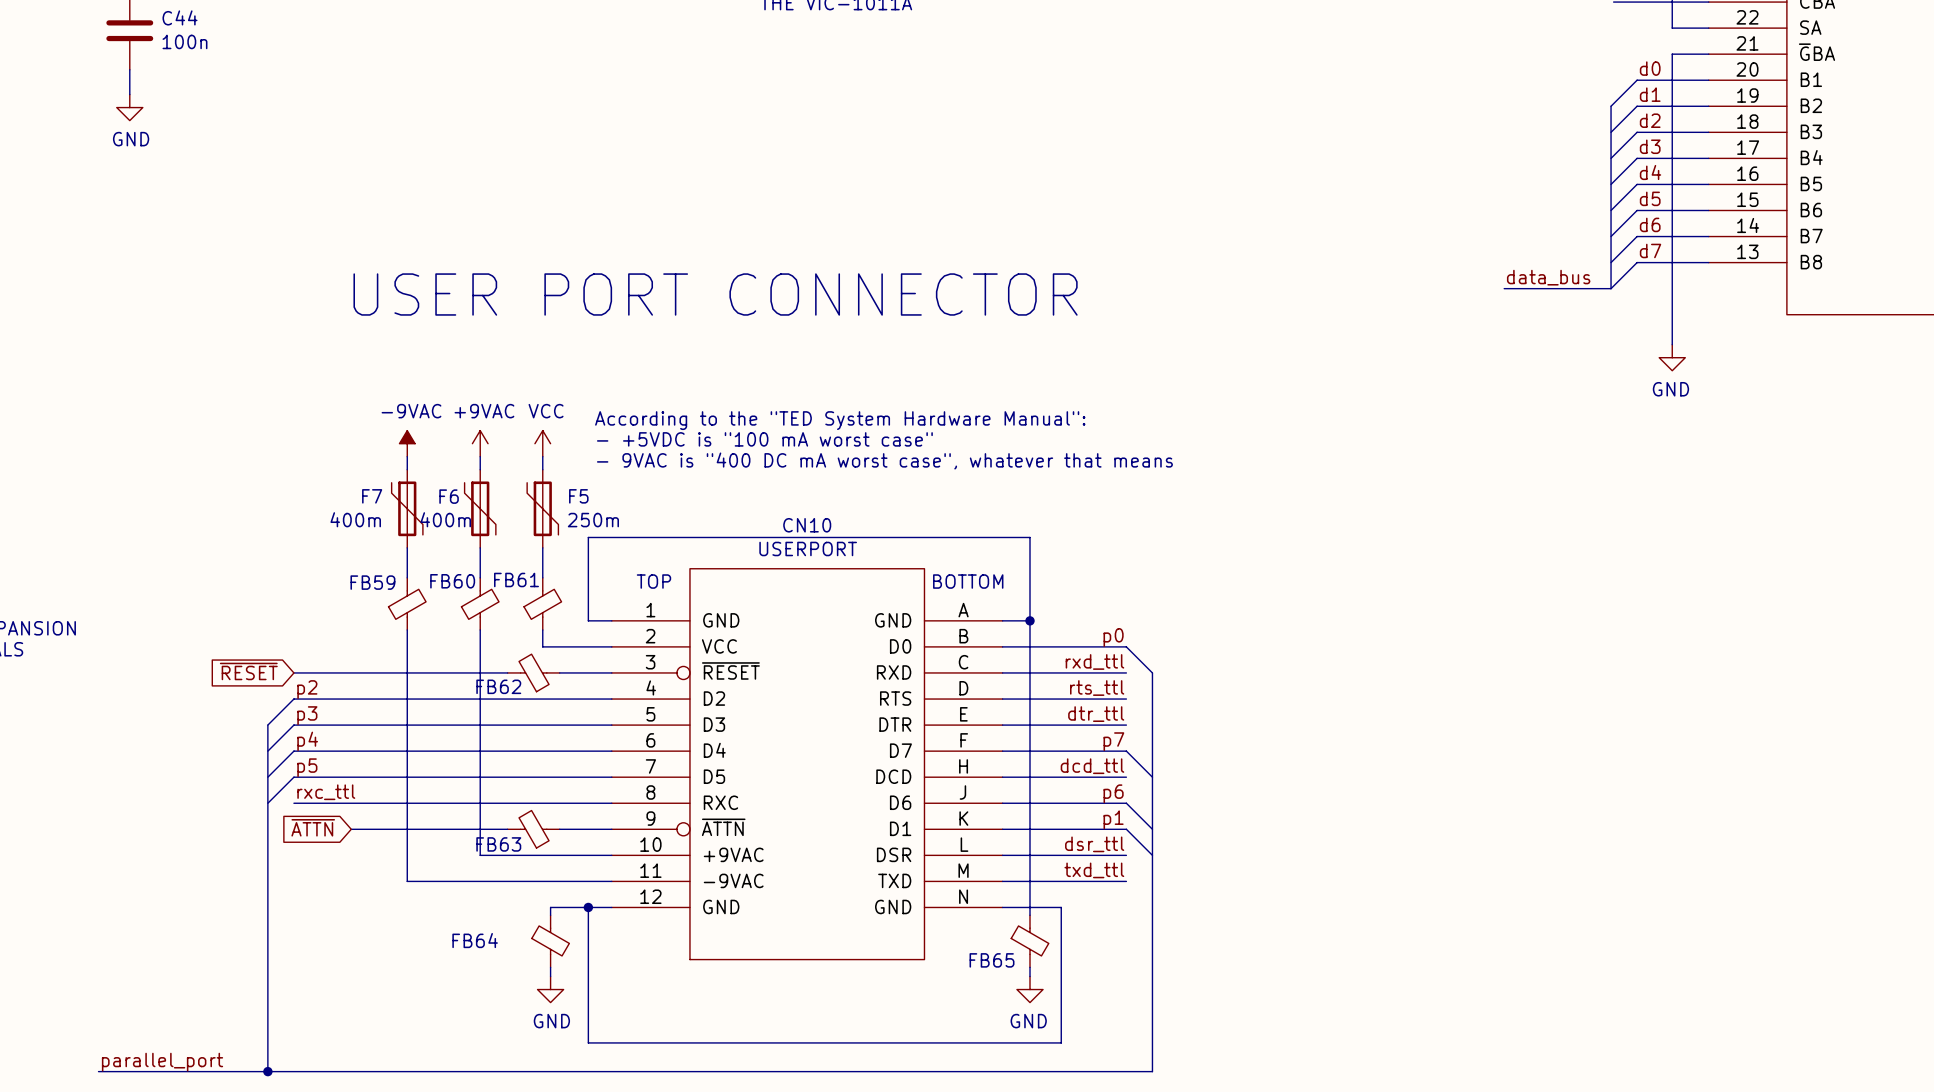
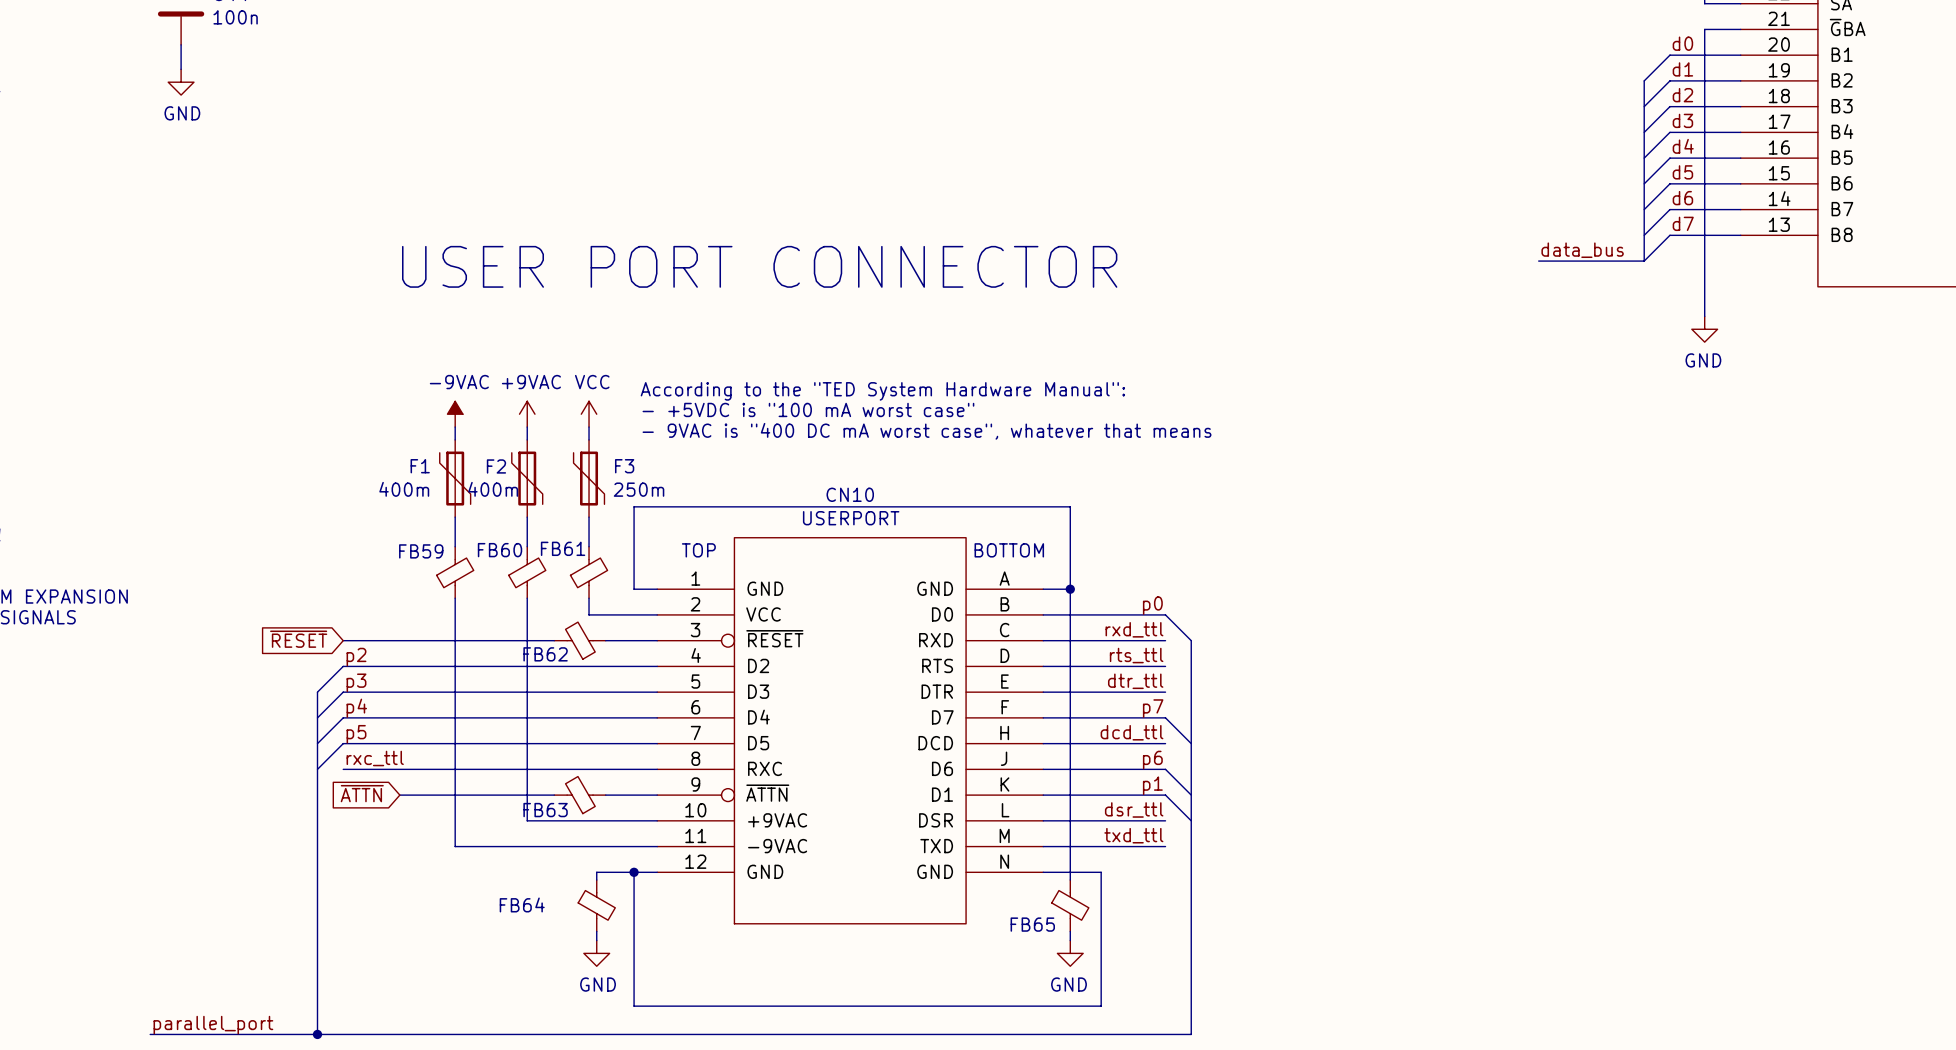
F7 name: F7 (372, 496) -> F1 (420, 466)
F6 name: F6 (449, 496) -> F2 (496, 466)
F5 name: F5 (578, 496) -> F3 (624, 466)

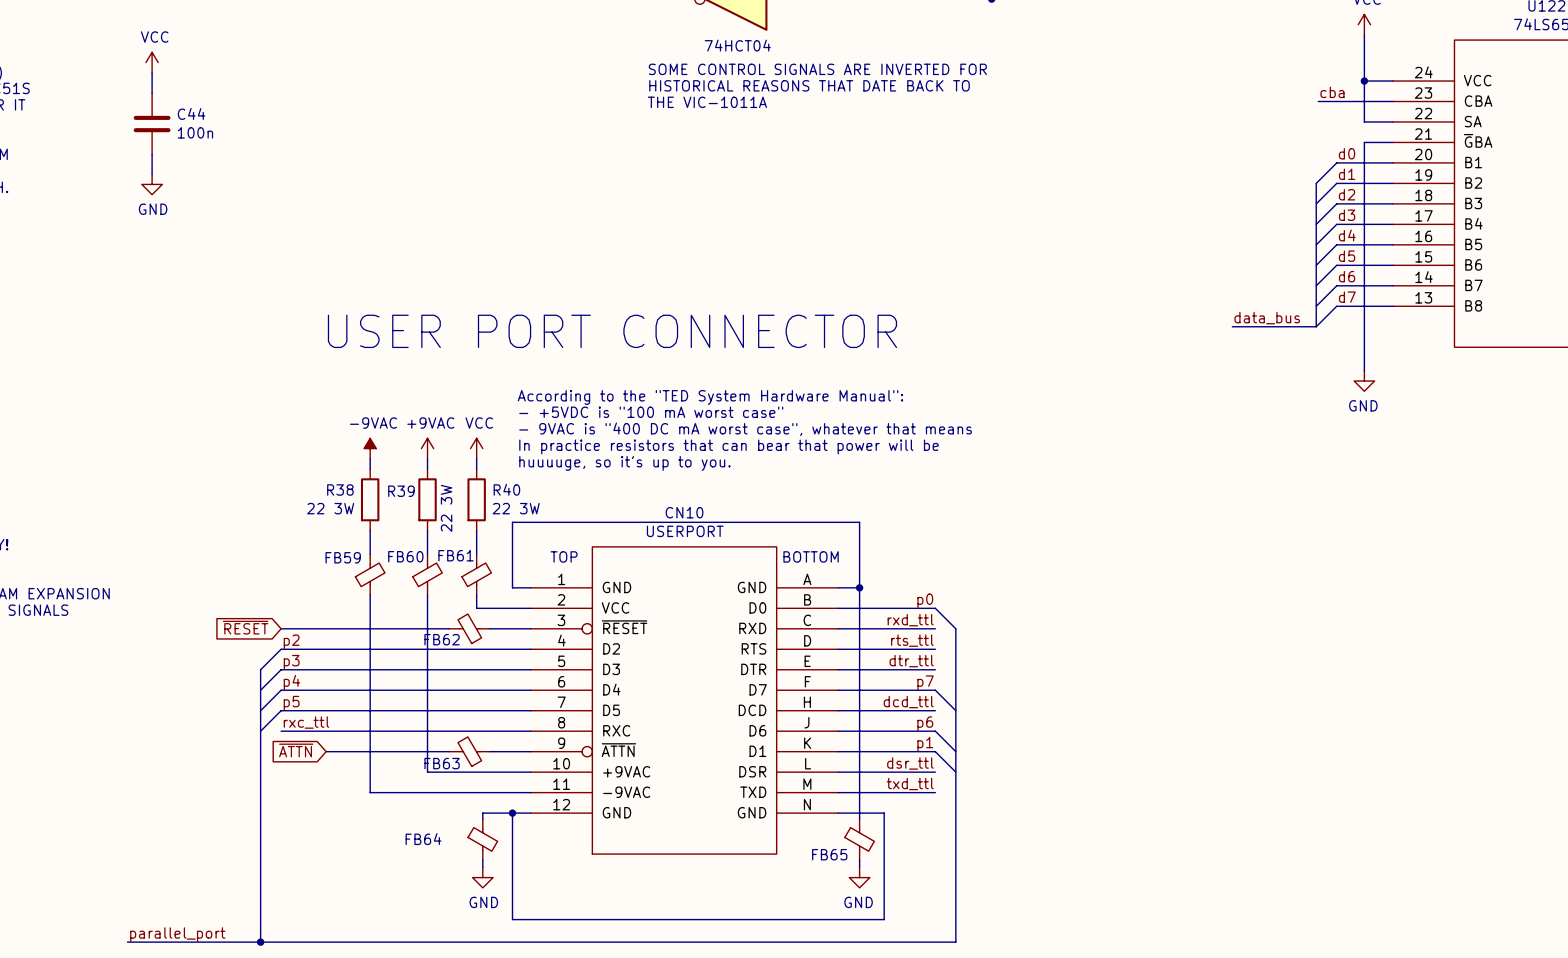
text: none -> According to the "TED System Hardware Manual": (710, 397)
text: none -> - +5VDC is "100 mA worst case" (651, 412)
text: According to the "TED System Hardware Manual": (882, 391) -> - 9VAC is "400 DC mA worst case", whatever that means (745, 429)
text: - +5VDC is "100 mA worst case" (808, 409) -> In practice resistors that can bear that power will be (729, 446)
text: - 9VAC is "400 DC mA worst case", whatever that means (927, 431) -> huuuuge, so it's up to you. (624, 463)
F1: 400m (455, 478) -> none
R38: none -> 22 3W (370, 499)
F2: 400m (527, 478) -> none
R39: none -> 22 3W (427, 499)
F3: 250m (589, 478) -> none
R40: none -> 22 3W (476, 499)

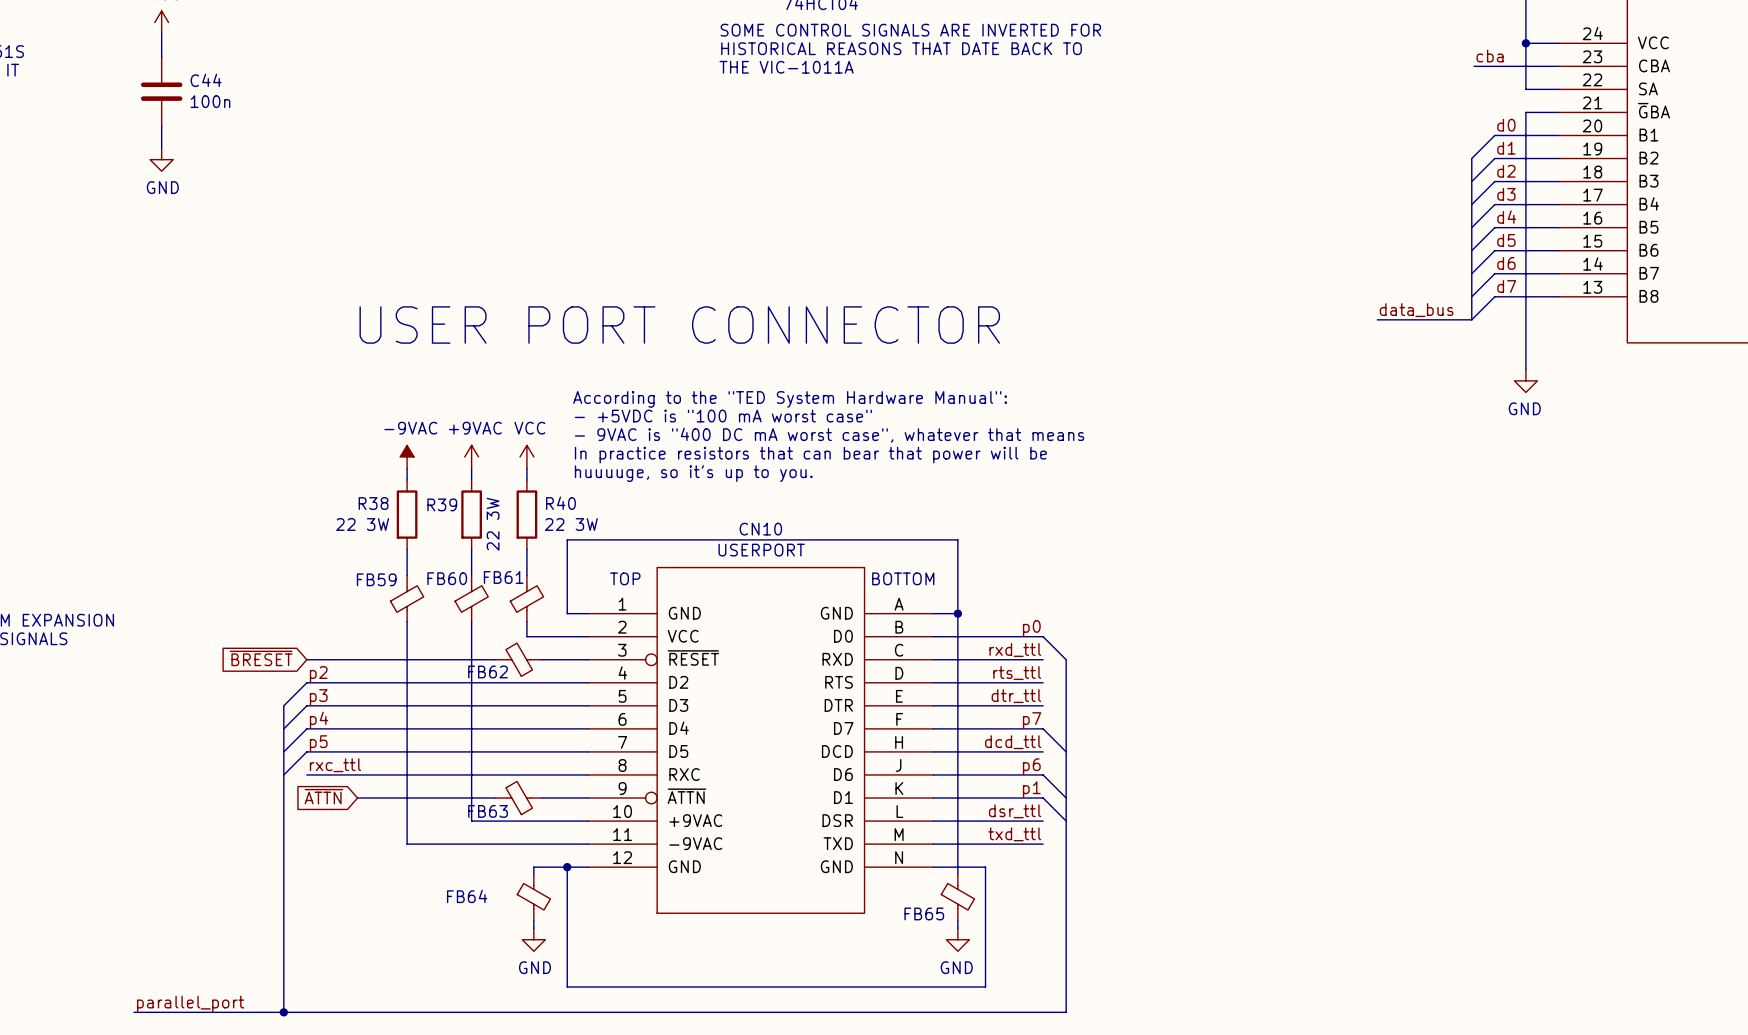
global label: ~{RESET} (245, 627) -> ~{BRESET} (261, 658)

